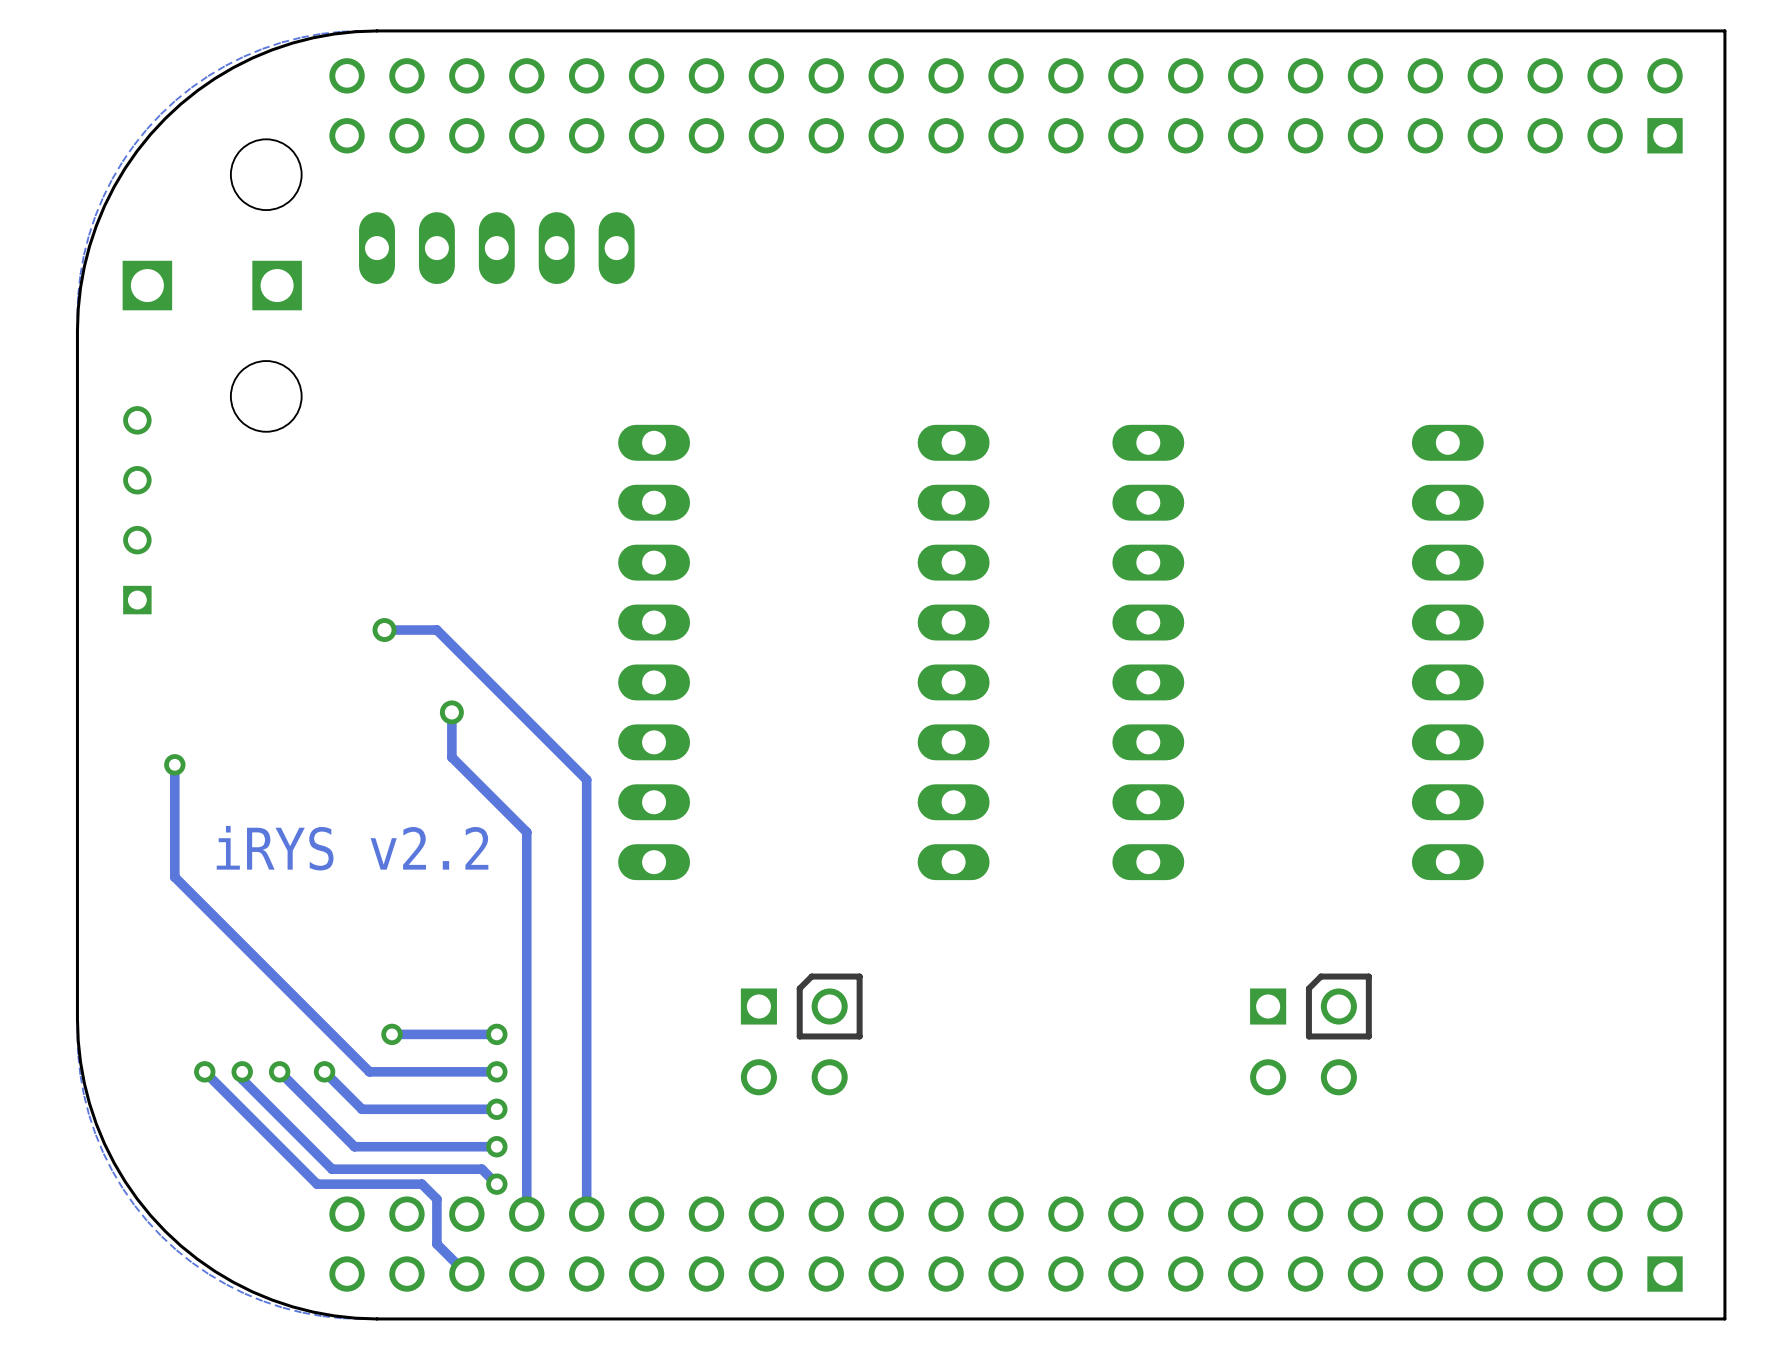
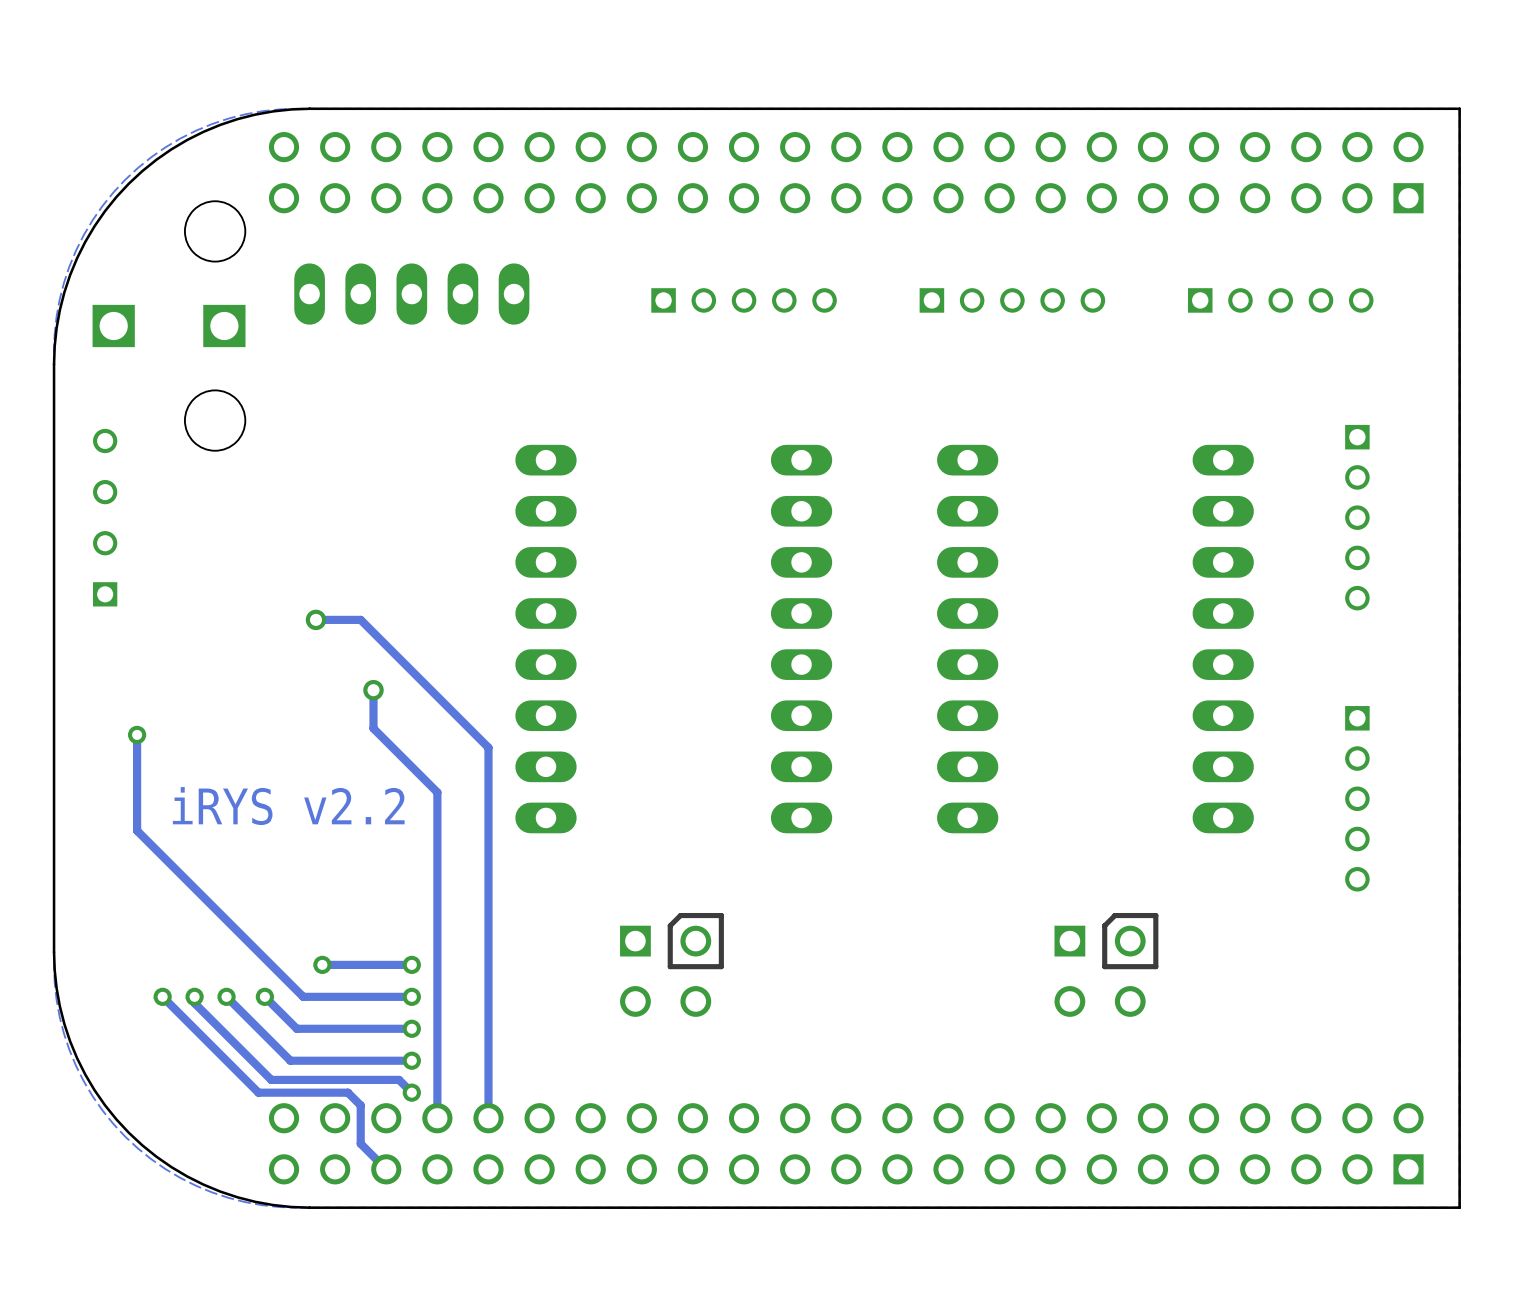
part: none -> (744, 300)
part: none -> (1012, 300)
part: none -> (1280, 300)
part: none -> (1357, 517)
part: none -> (1357, 798)

